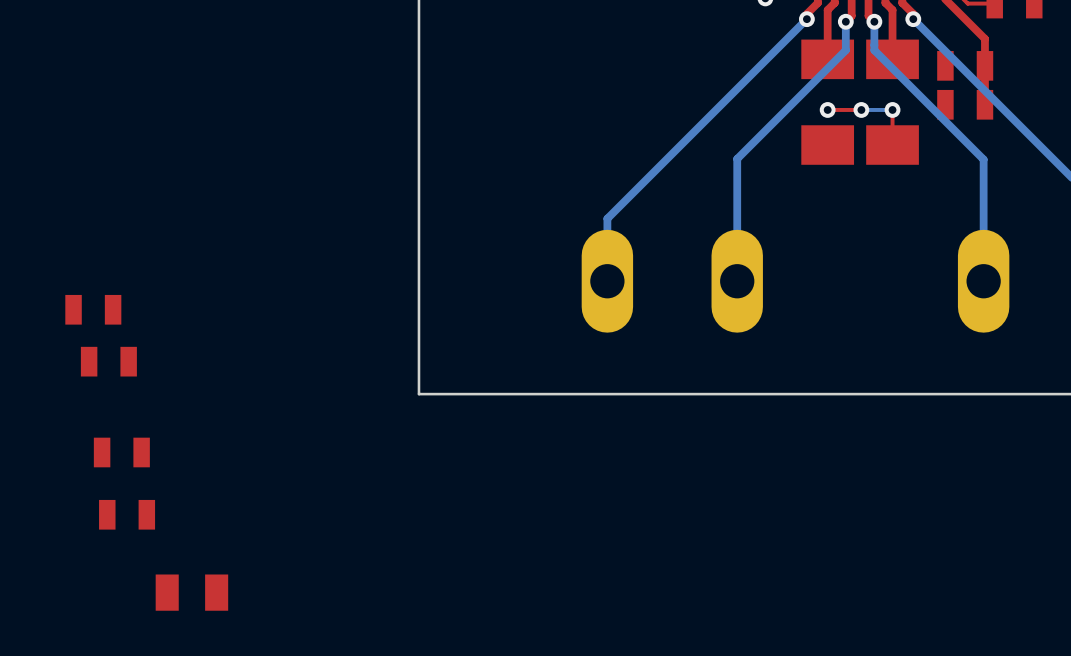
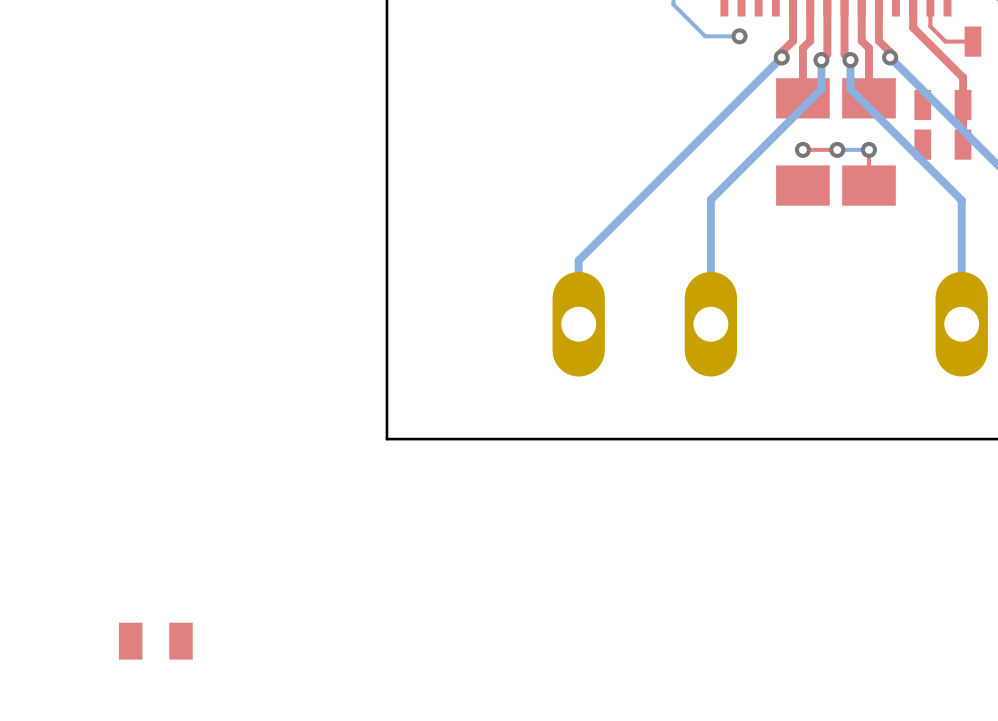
part: (93, 309) -> none
part: (108, 361) -> none
part: (121, 452) -> none
part: (127, 514) -> none

